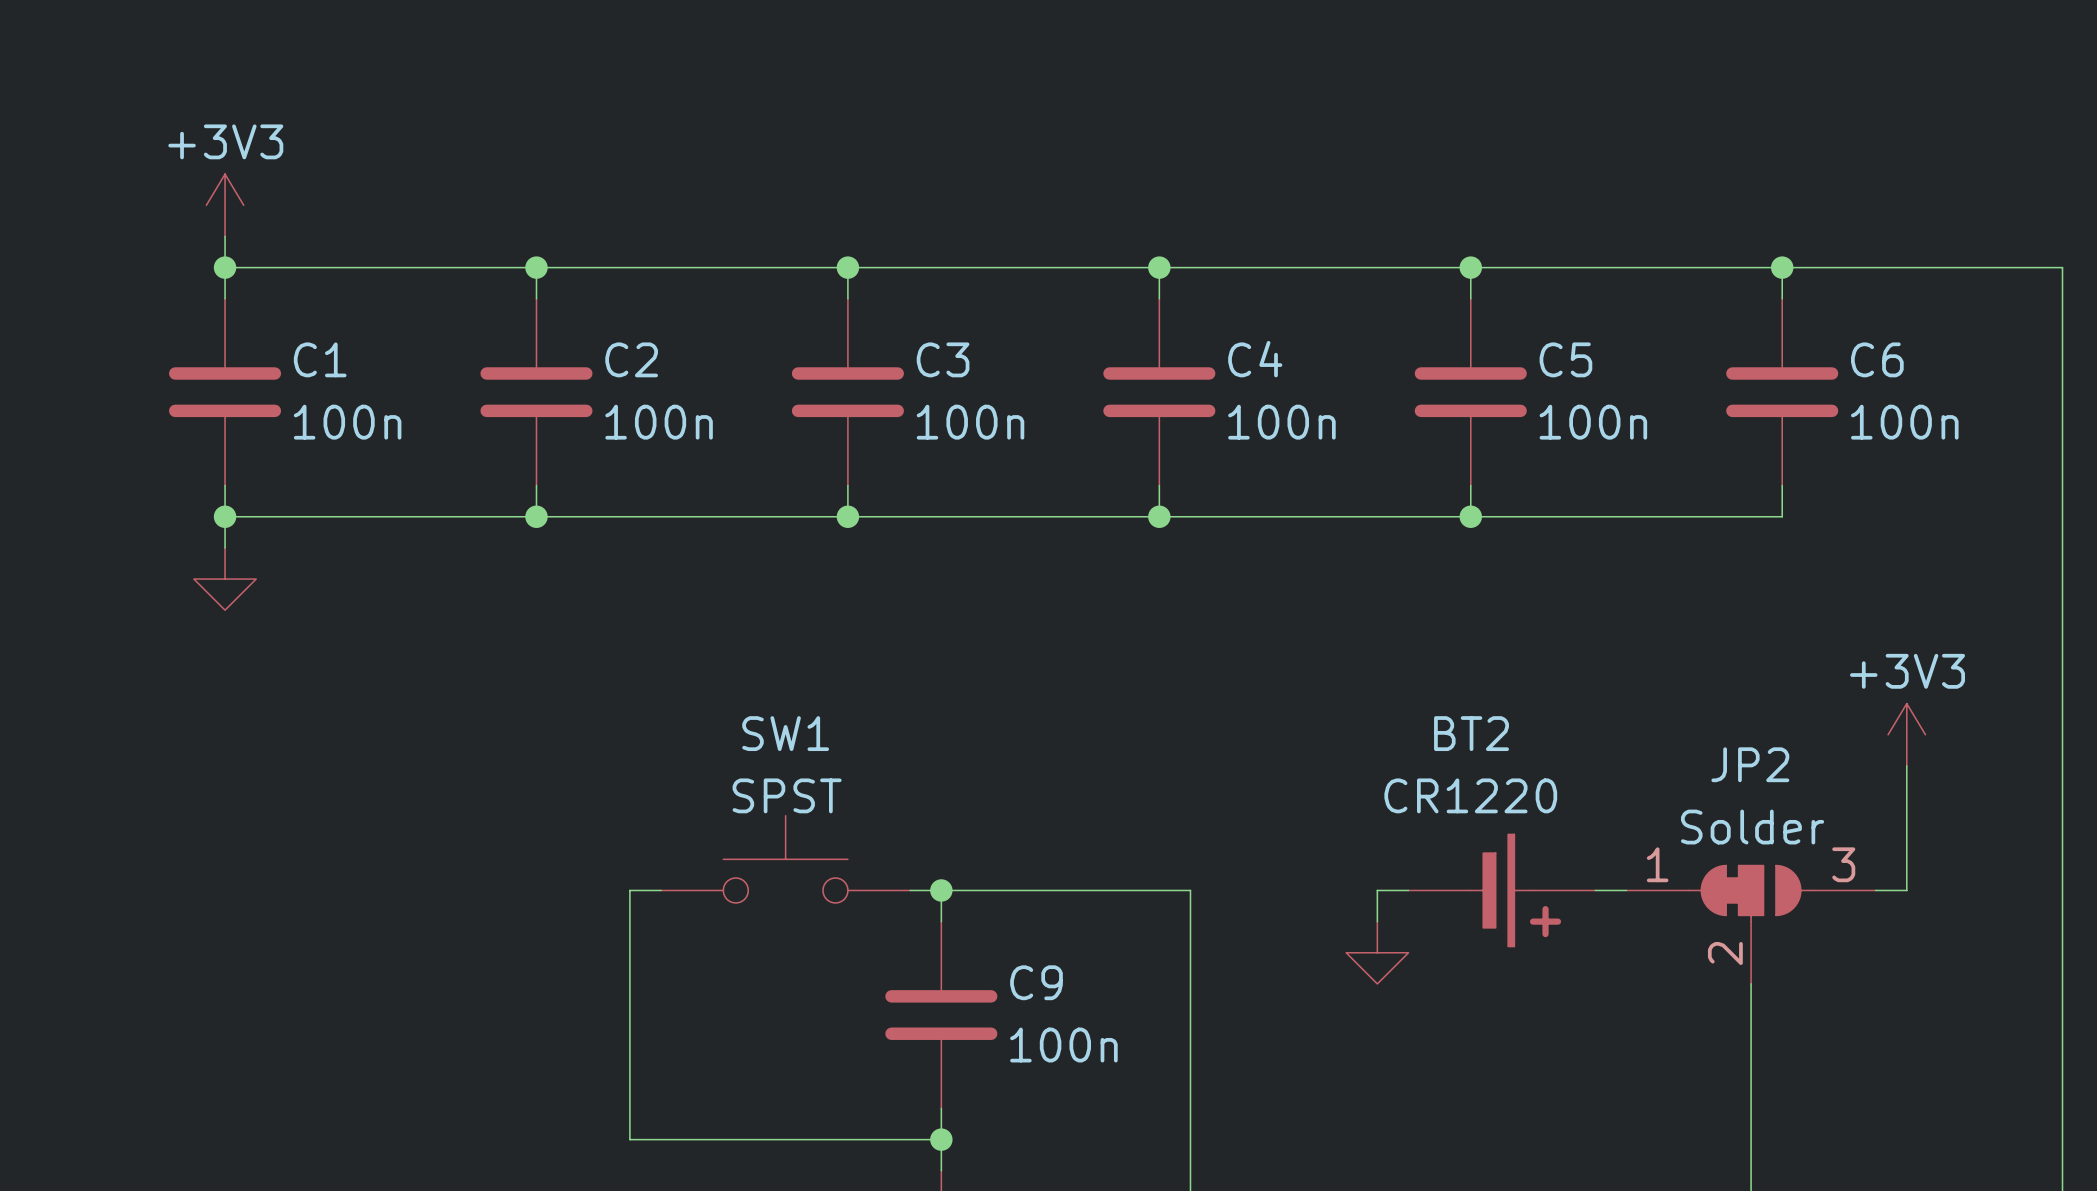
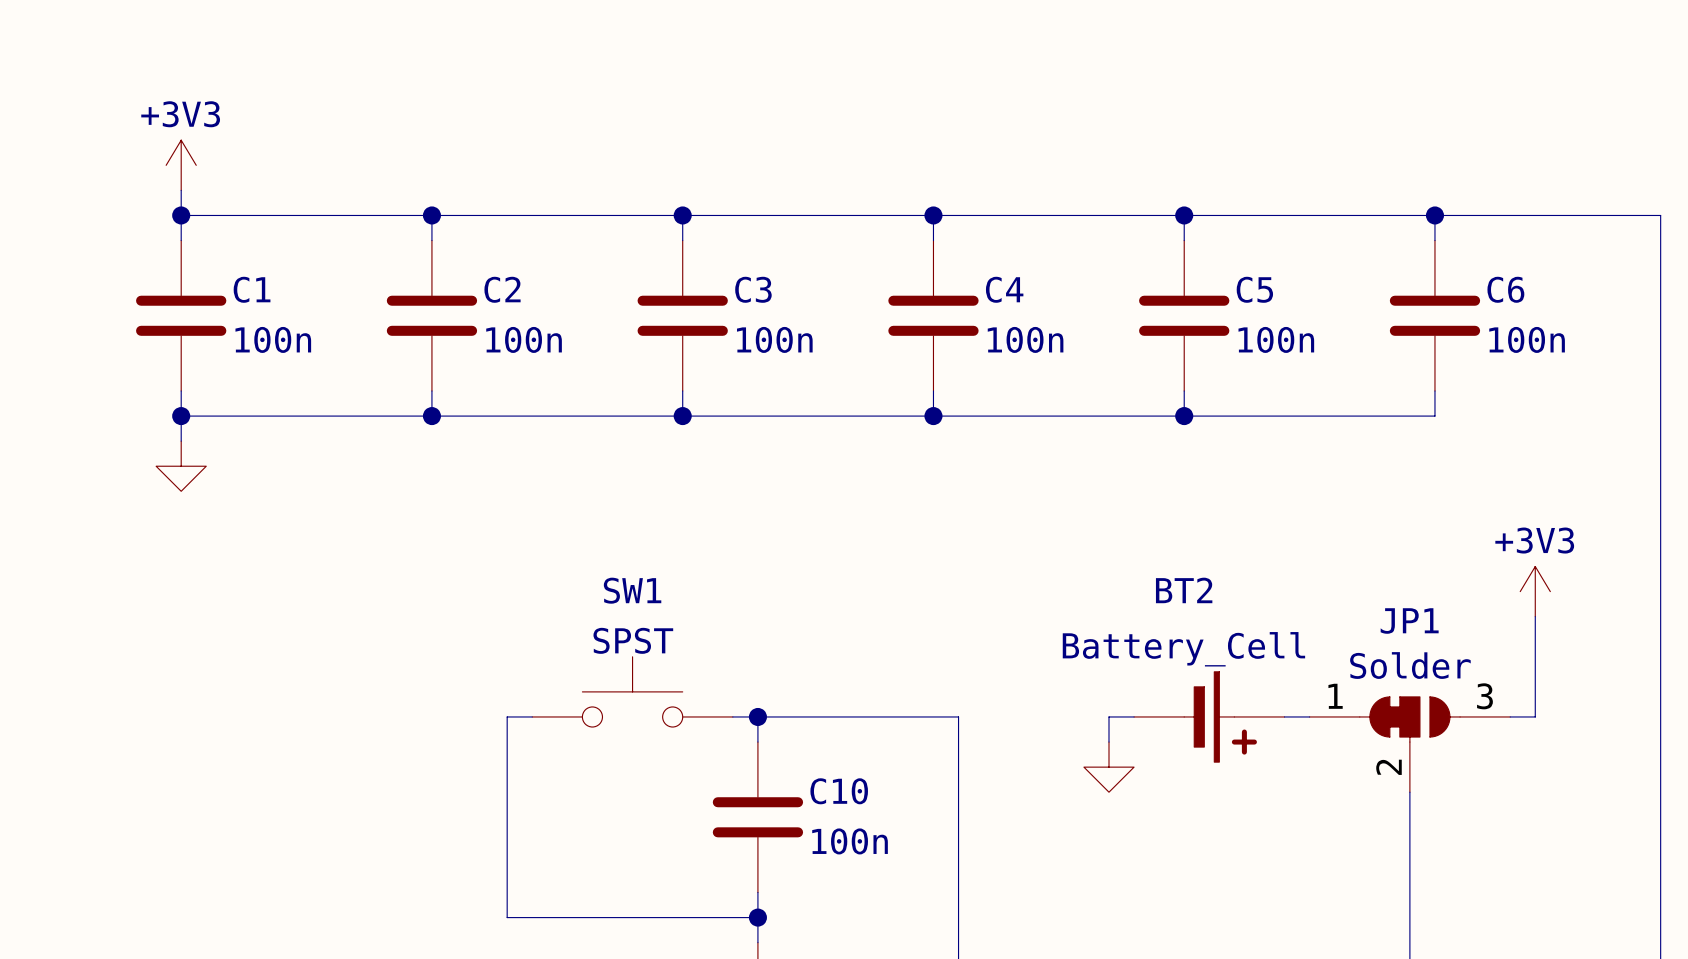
JP2 name: JP2 (1750, 764) -> JP1 (1409, 621)
BT2 value: CR1220 (1470, 795) -> Battery_Cell (1183, 649)
C9 name: C9 (1036, 982) -> C10 (839, 791)

